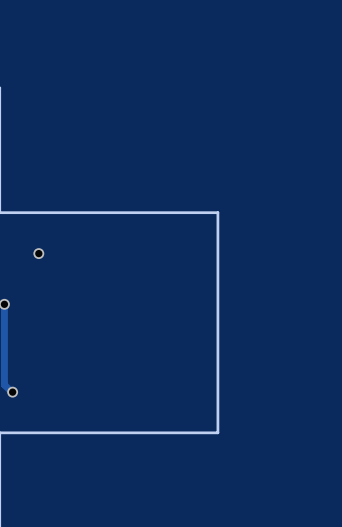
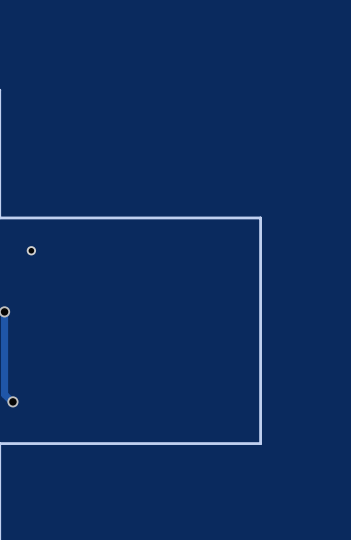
board edge: (217, 212) (217, 432) -> (223, 217) (260, 217) (260, 443) (223, 443)
part: none -> (31, 250)
via: (38, 253) -> none

